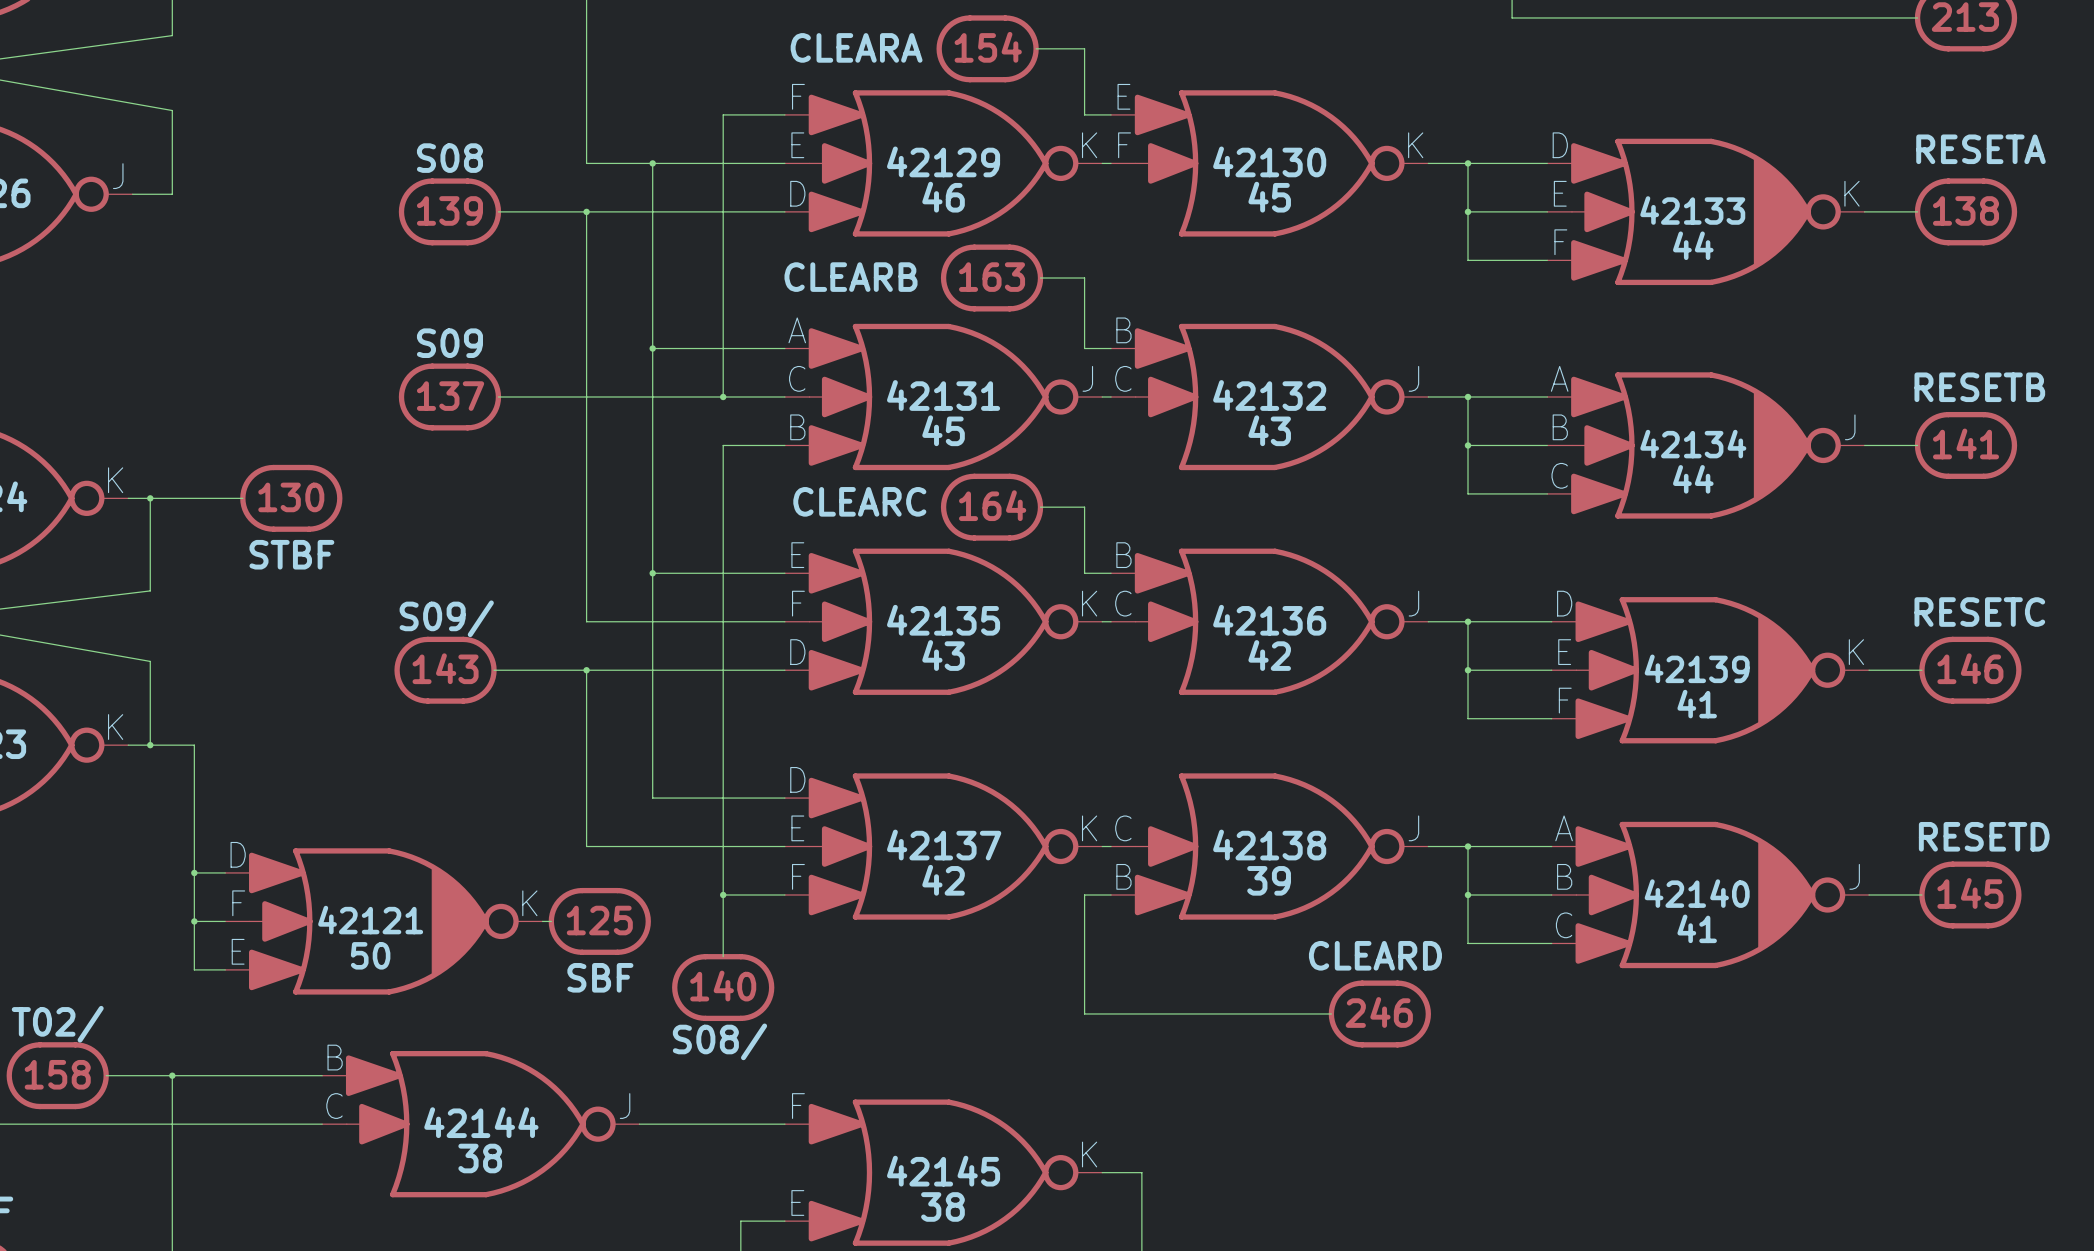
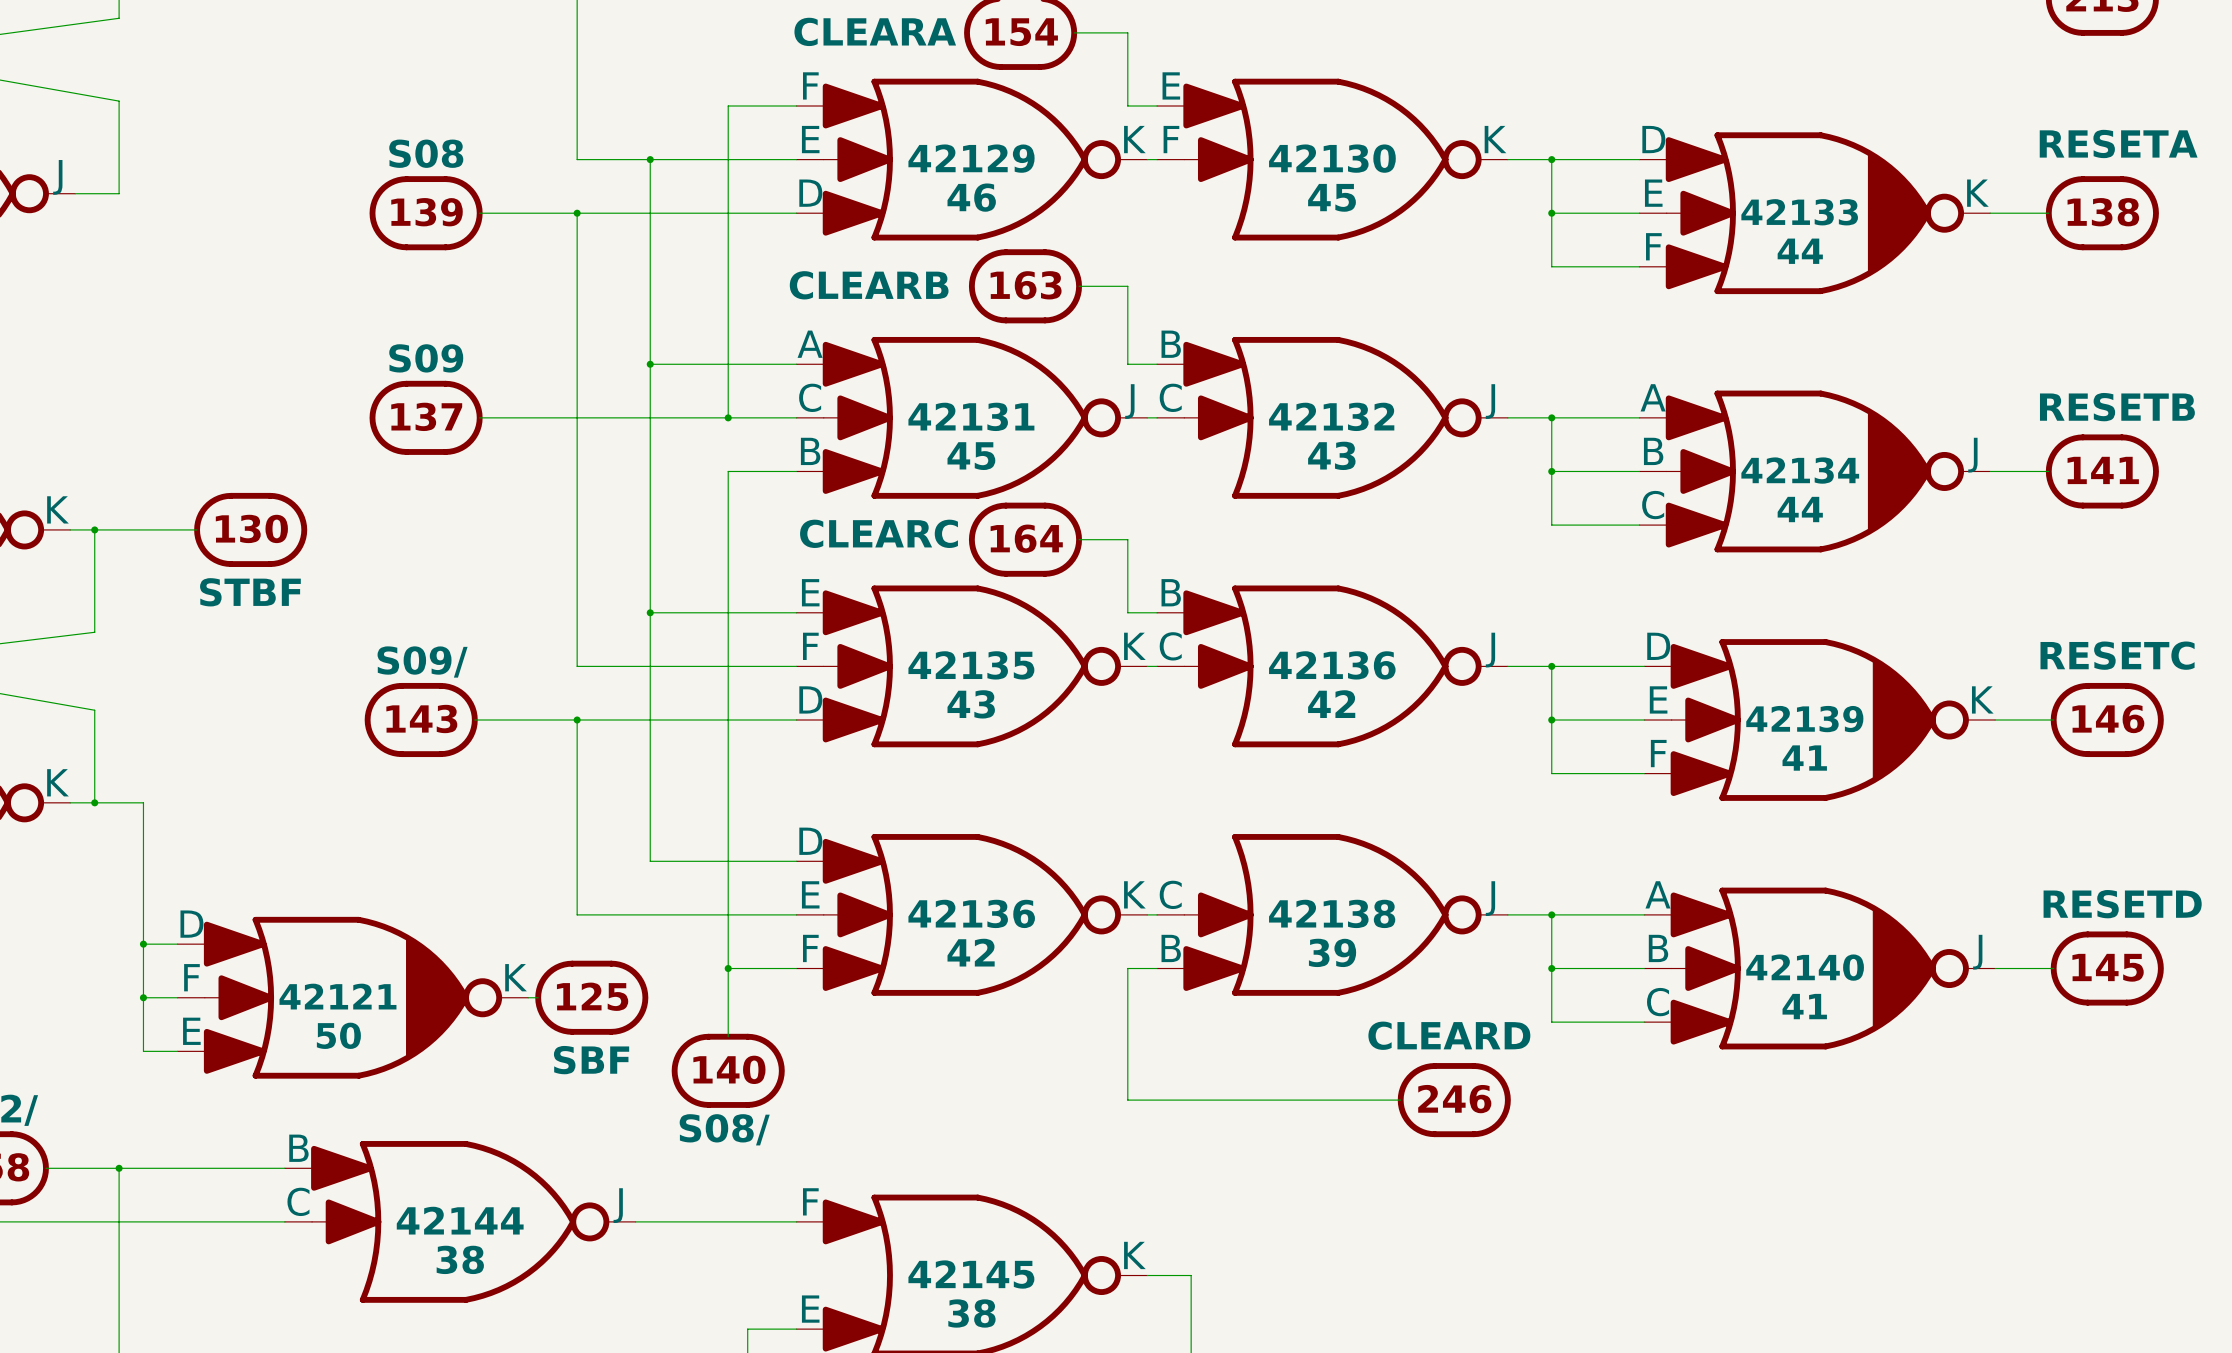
part text: 42137 (944, 845) -> 42136 (971, 913)

